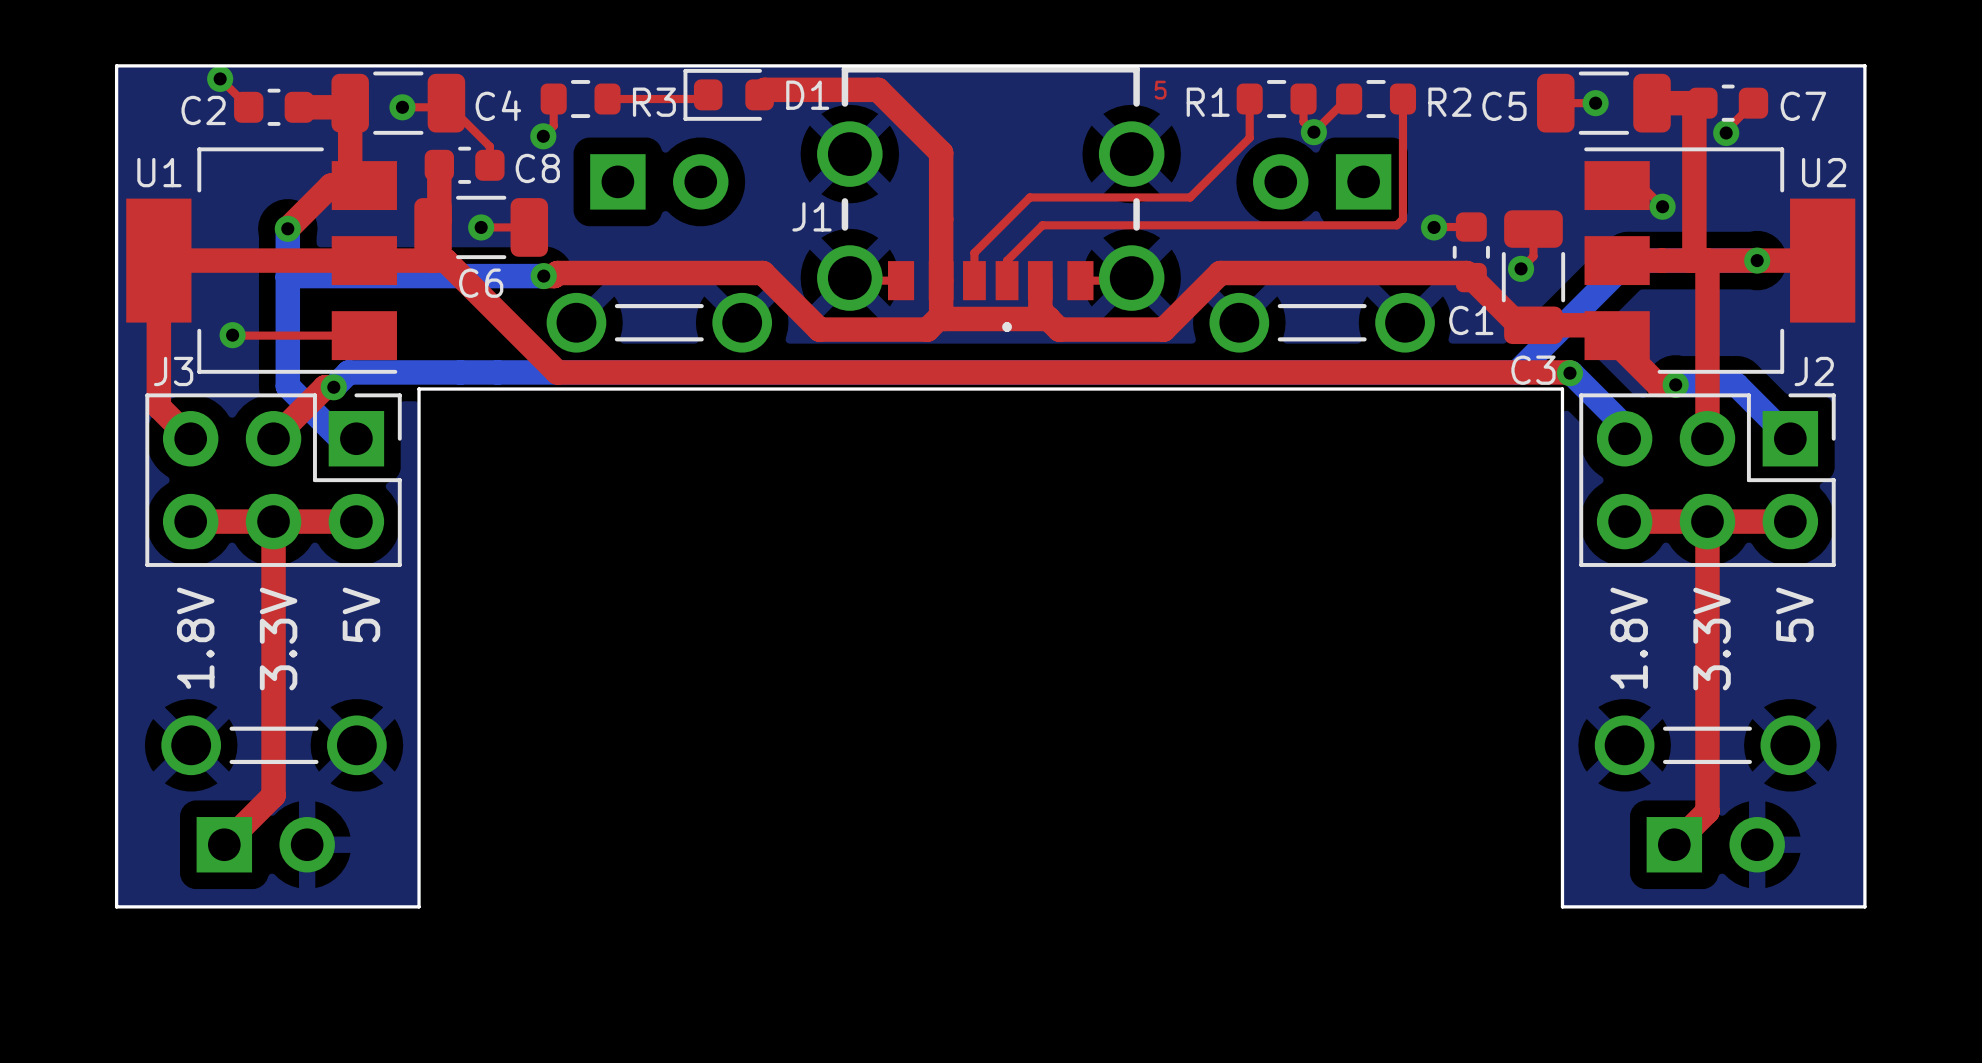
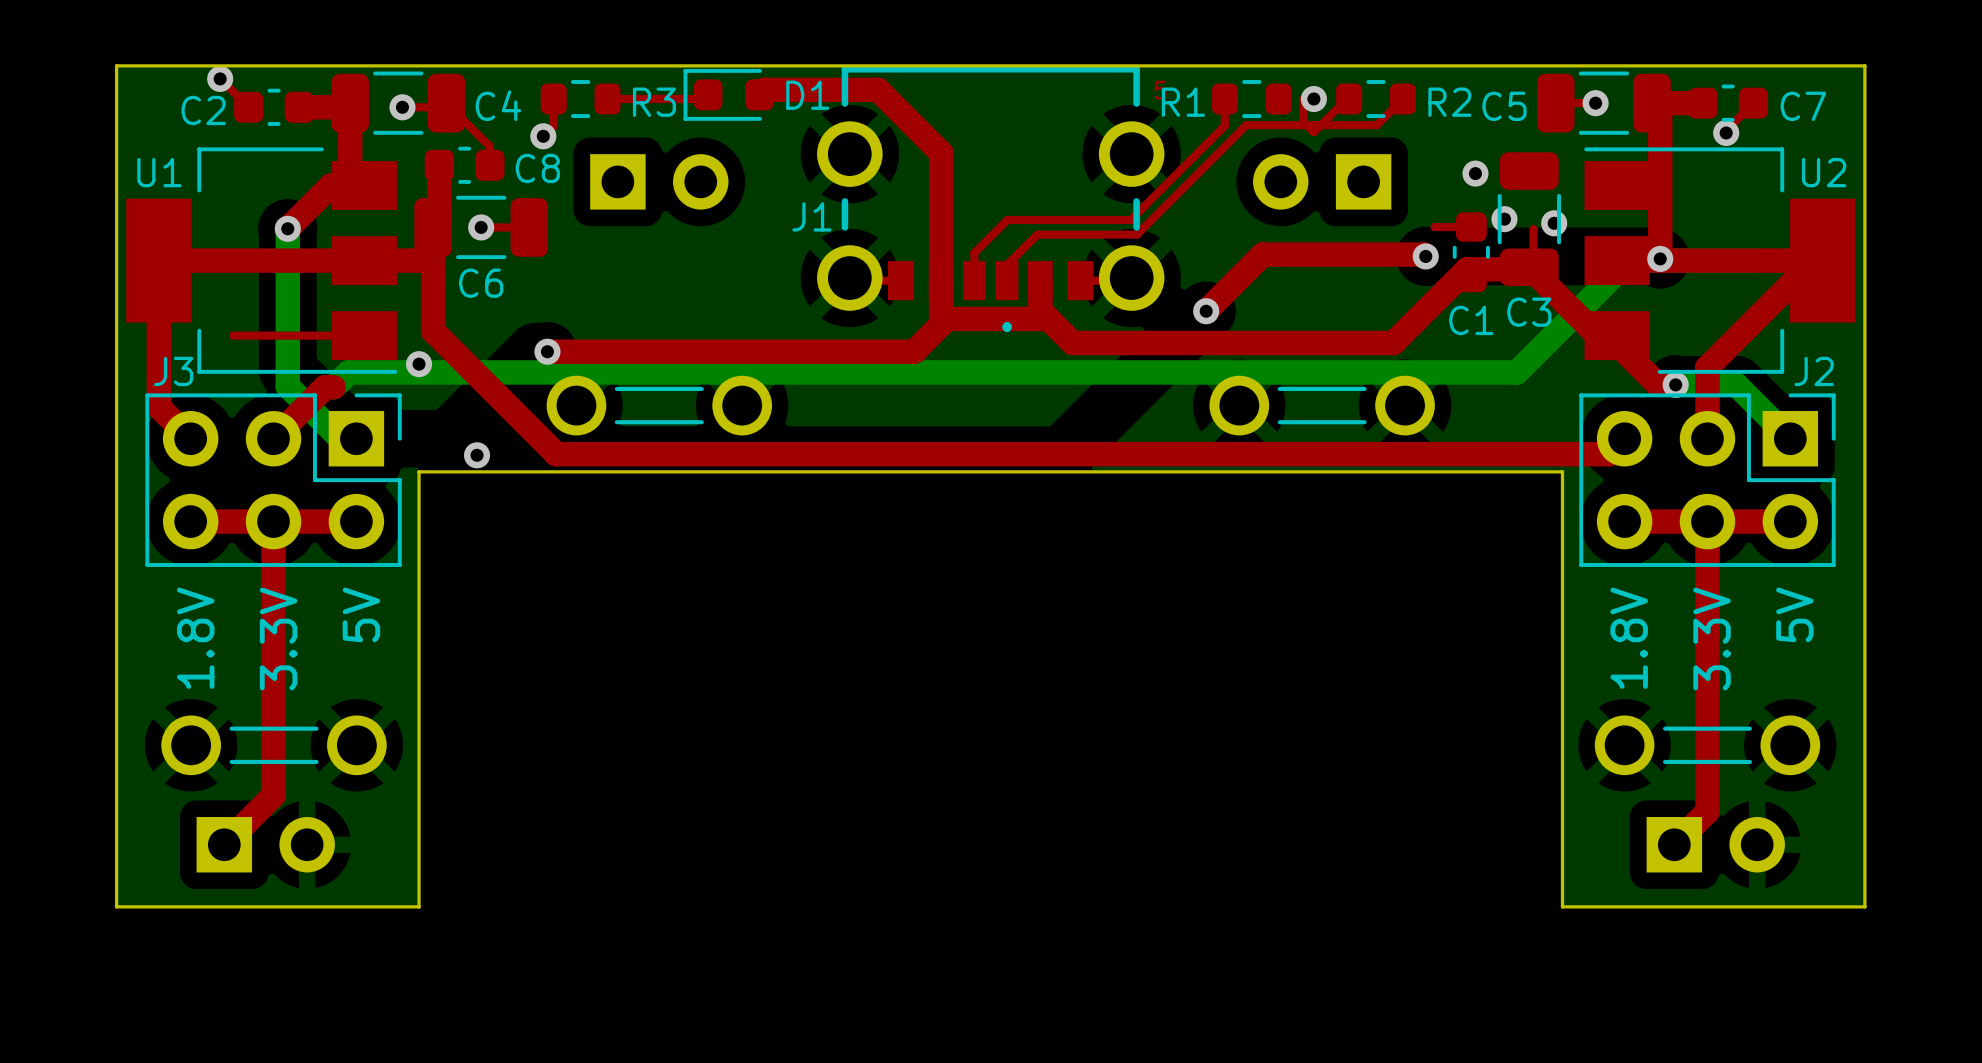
top track: (1249, 99) (1249, 137) (1190, 197) (1029, 197) (1007, 219) -> (1224, 99) (1224, 125) (1130, 219) (1007, 219)
R1 position: (1276, 99) -> (1251, 99)
top track: (1402, 99) (1402, 219) (1396, 225) (1042, 225) (1007, 260) (1007, 264) -> (1402, 99) (1376, 125) (1246, 125) (1136, 234) (1037, 234) (1007, 264)
top track: none -> (1652, 103) (1660, 111) (1660, 258) (1661, 260)
top track: (1702, 103) (1694, 111) (1694, 257) (1690, 260) -> none
via position: (1313, 132) -> (1313, 99)
via: none -> (1475, 173)
via: (1662, 206) -> none
via: none -> (1504, 219)
via: none -> (1554, 223)
via position: (1434, 227) -> (1425, 256)
top track: none -> (1425, 256) (1423, 254) (1262, 254) (1206, 311)
via: none -> (1660, 258)
top track: (433, 260) (445, 260) (557, 372) (1569, 373) -> (433, 260) (433, 330) (556, 454) (1609, 454) (1624, 438)
top track: (1707, 260) (1707, 367) -> (1814, 260) (1707, 367)
via: (1757, 260) -> none
via: (1521, 268) -> none
top track: (543, 276) (554, 276) (557, 273) (762, 273) (819, 329) (927, 329) (941, 315) -> (547, 351) (914, 351) (941, 324) (941, 315)
bottom track: (543, 276) (287, 277) -> none
via position: (543, 276) -> (547, 351)
C3 position: (1533, 277) -> (1529, 219)
via: none -> (1206, 311)
part position: (659, 322) -> (659, 405)
part position: (1322, 322) -> (1322, 405)
top track: (1606, 325) (1519, 325) (1466, 273) (1220, 273) (1163, 329) (1059, 329) -> (1601, 343) (1608, 335) (1597, 335) (1529, 267) (1527, 269) (1467, 269) (1393, 343) (1072, 343) (1059, 329)
via: (232, 335) -> none
via: none -> (419, 364)
bottom track: (1569, 373) (1624, 426) (1624, 438) -> none
via: (1569, 373) -> none
via: (333, 387) -> none
via: none -> (477, 455)
board edge: (419, 471) (419, 389) (1562, 389) (1562, 471) -> (419, 471) (1562, 471)

